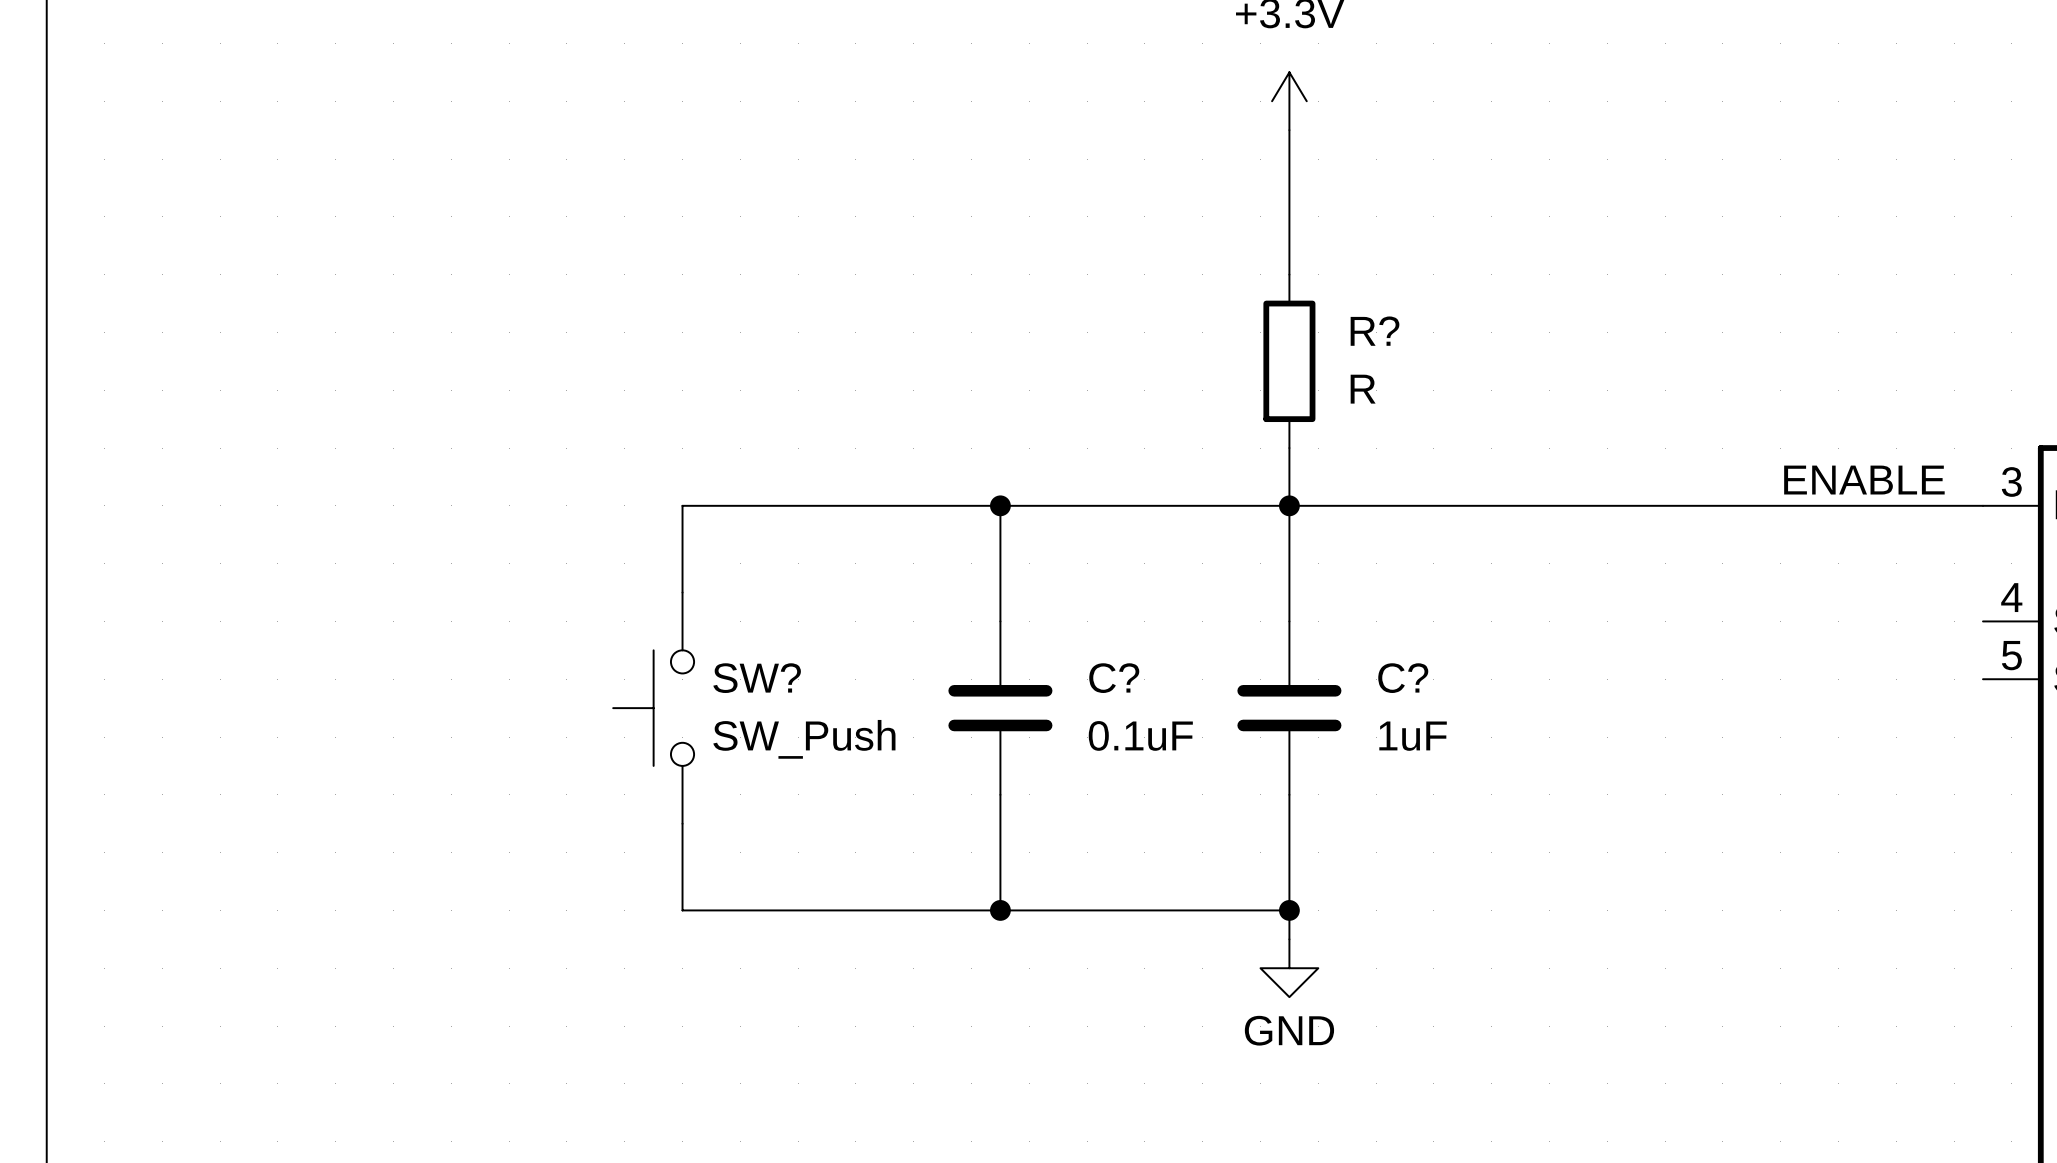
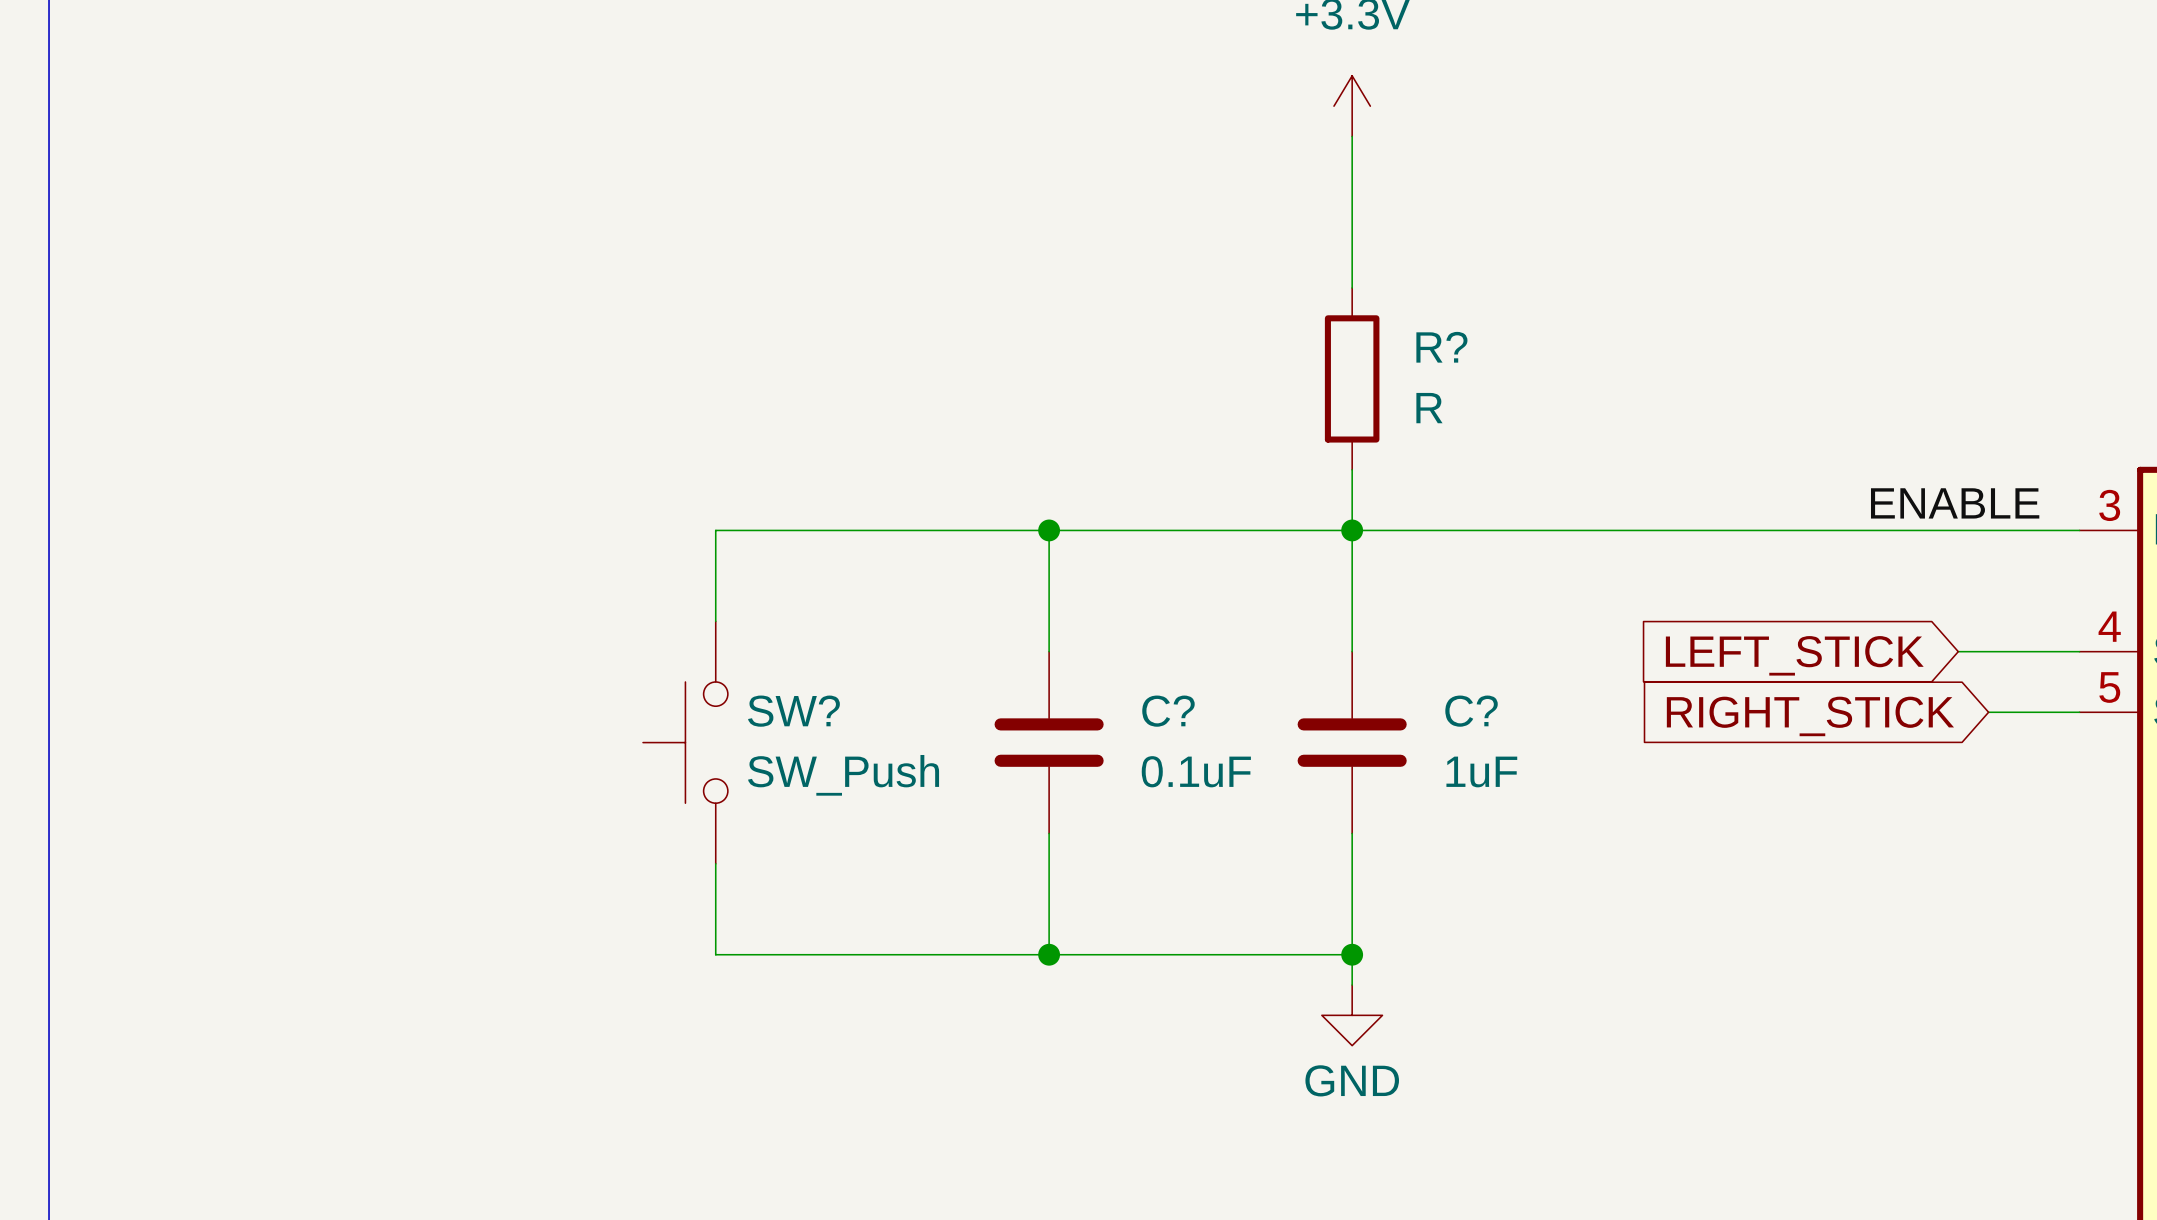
wire: none -> (1958, 651) (2079, 651)
global label: none -> LEFT_STICK (1794, 655)
wire: none -> (1988, 712) (2079, 712)
global label: none -> RIGHT_STICK (1810, 716)

